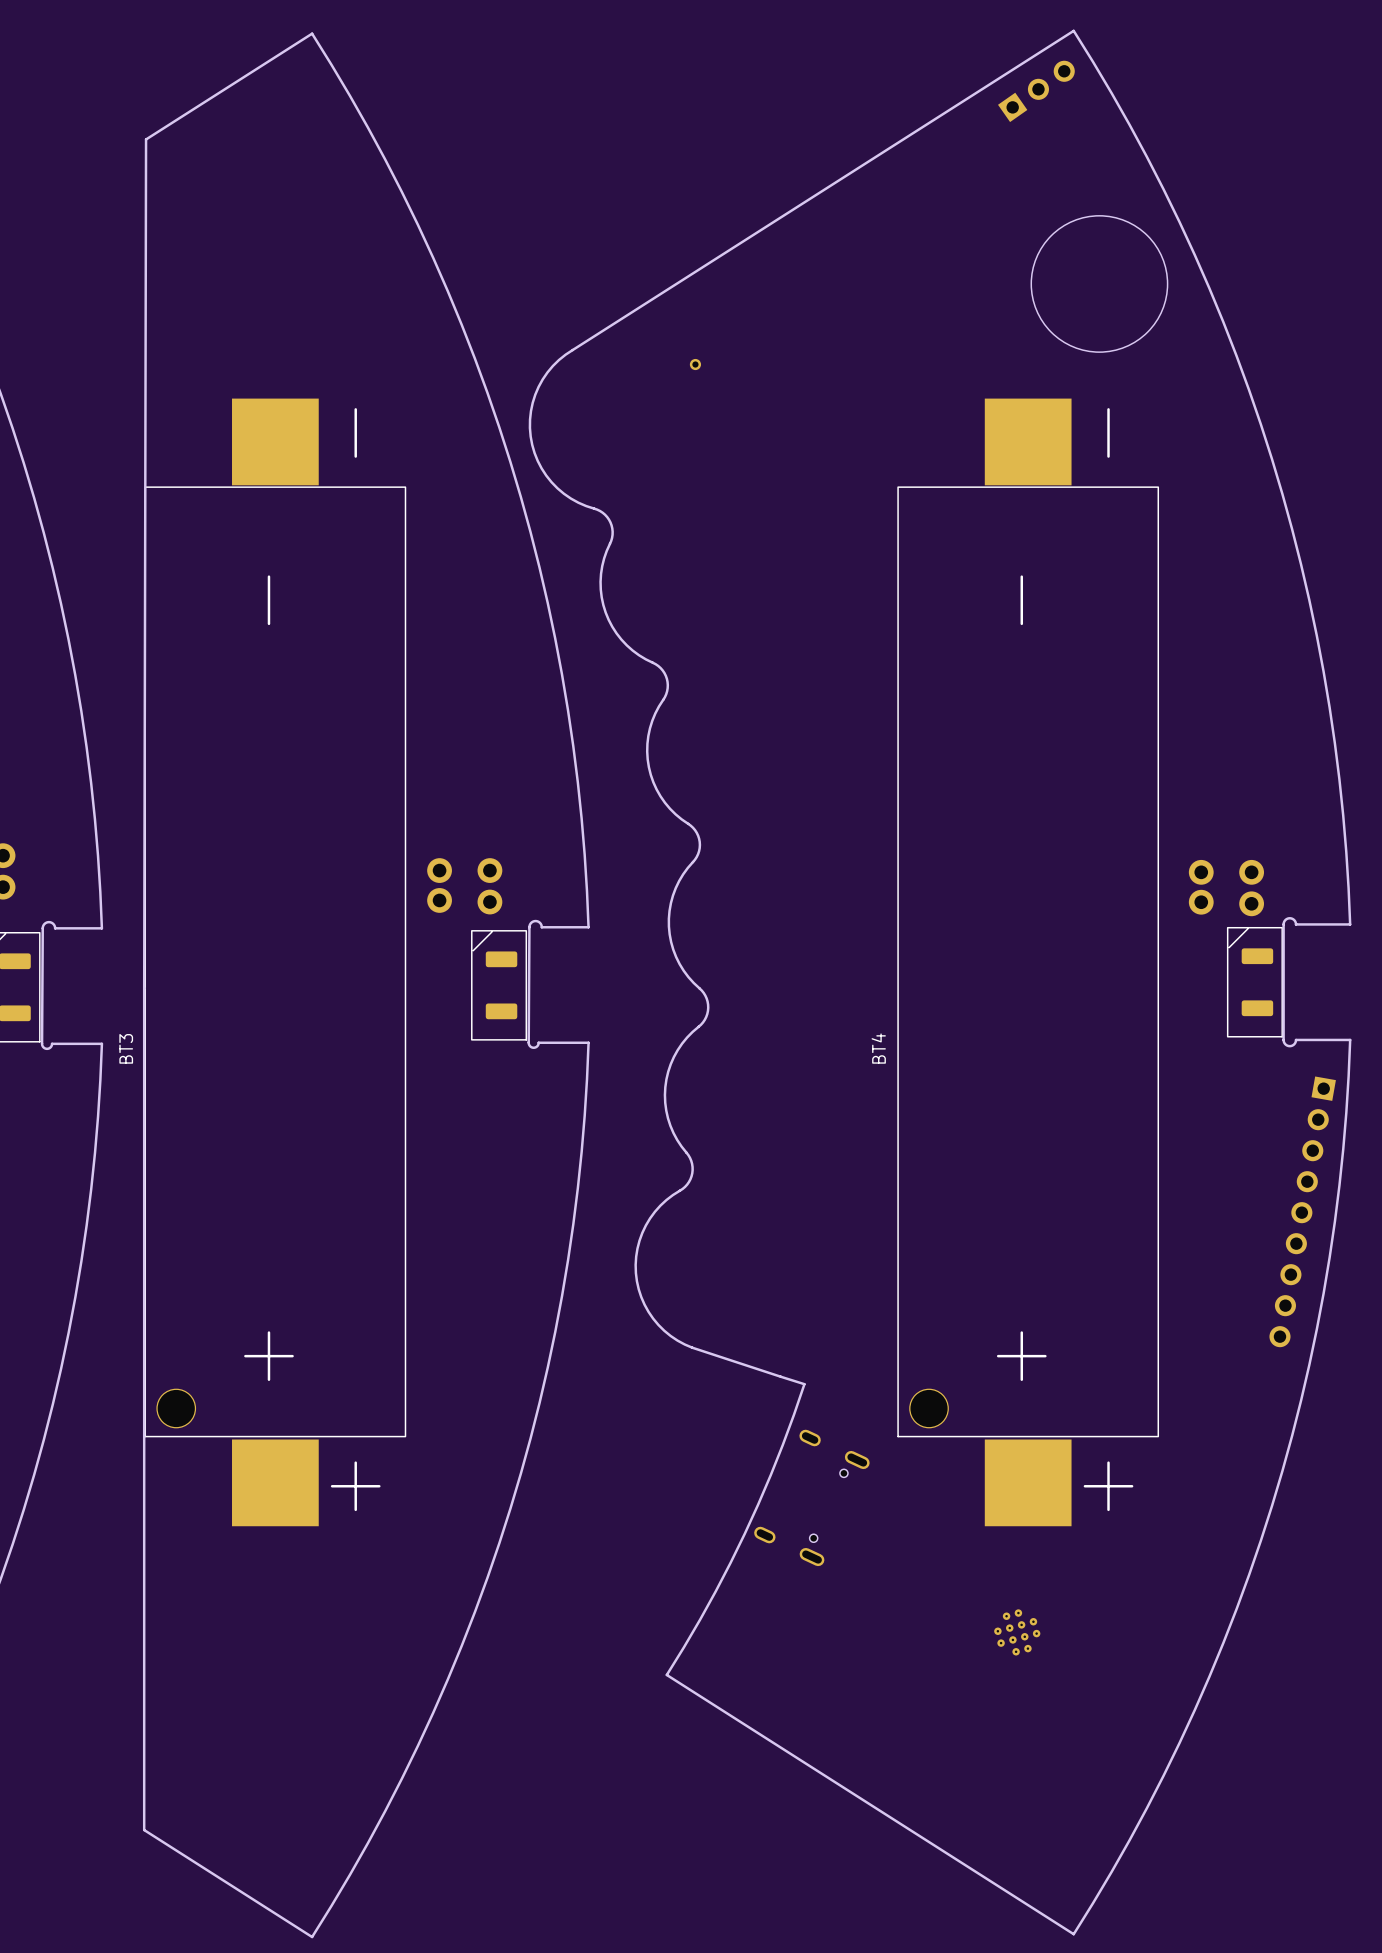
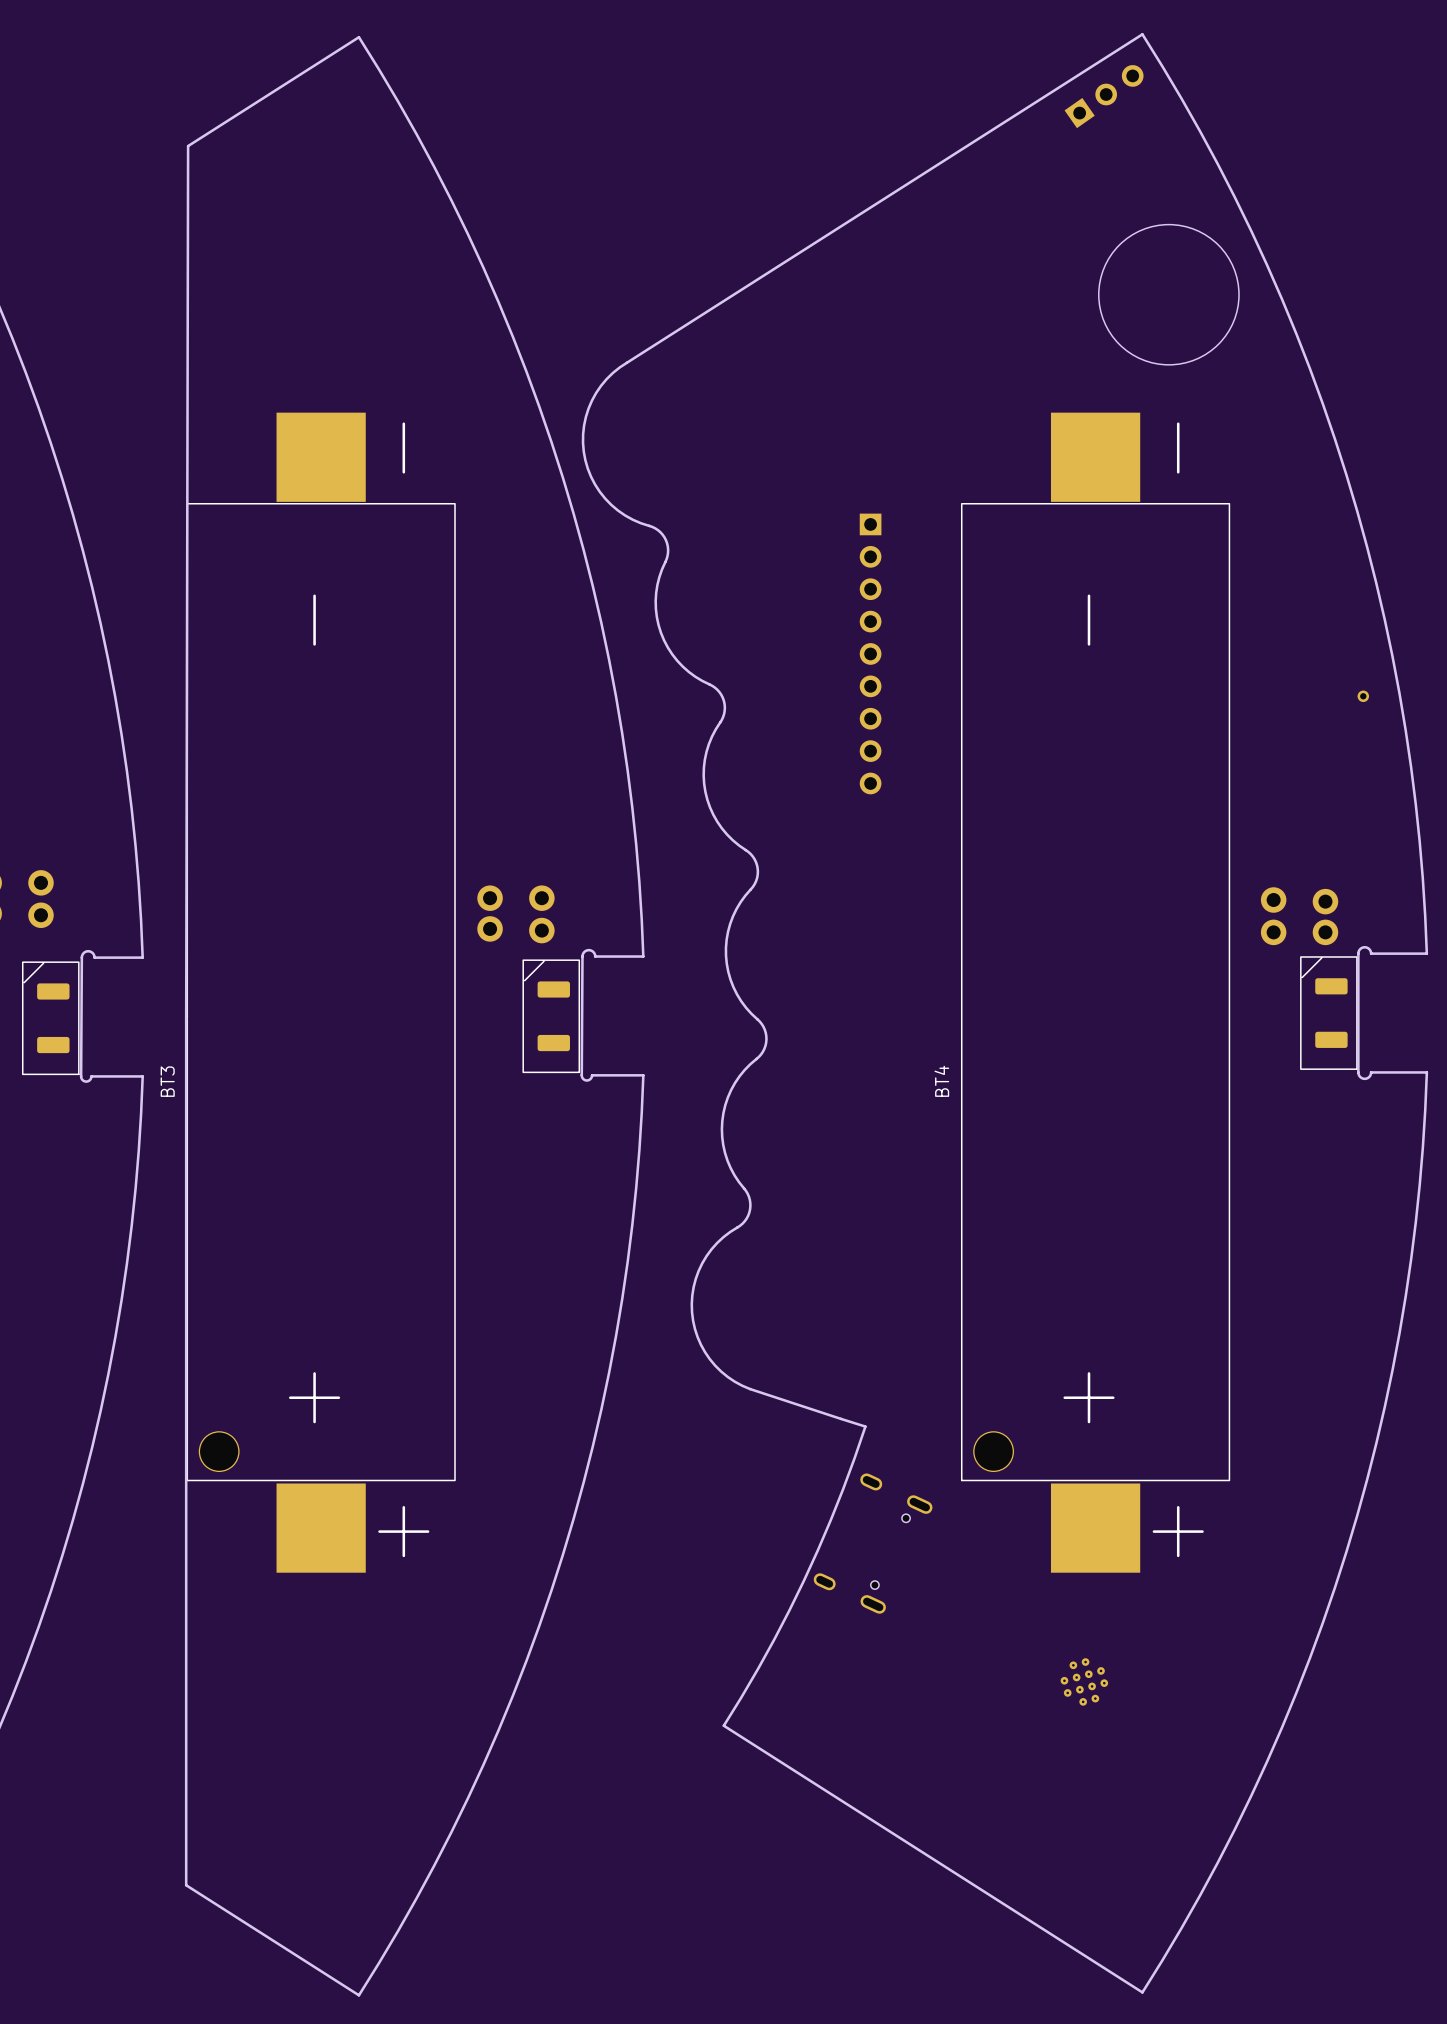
part: (695, 364) -> none
part: none -> (870, 653)
part: none -> (1363, 696)
part rotation: 0° (1226, 888) -> 180° (1299, 916)
part: (1302, 1211) -> none

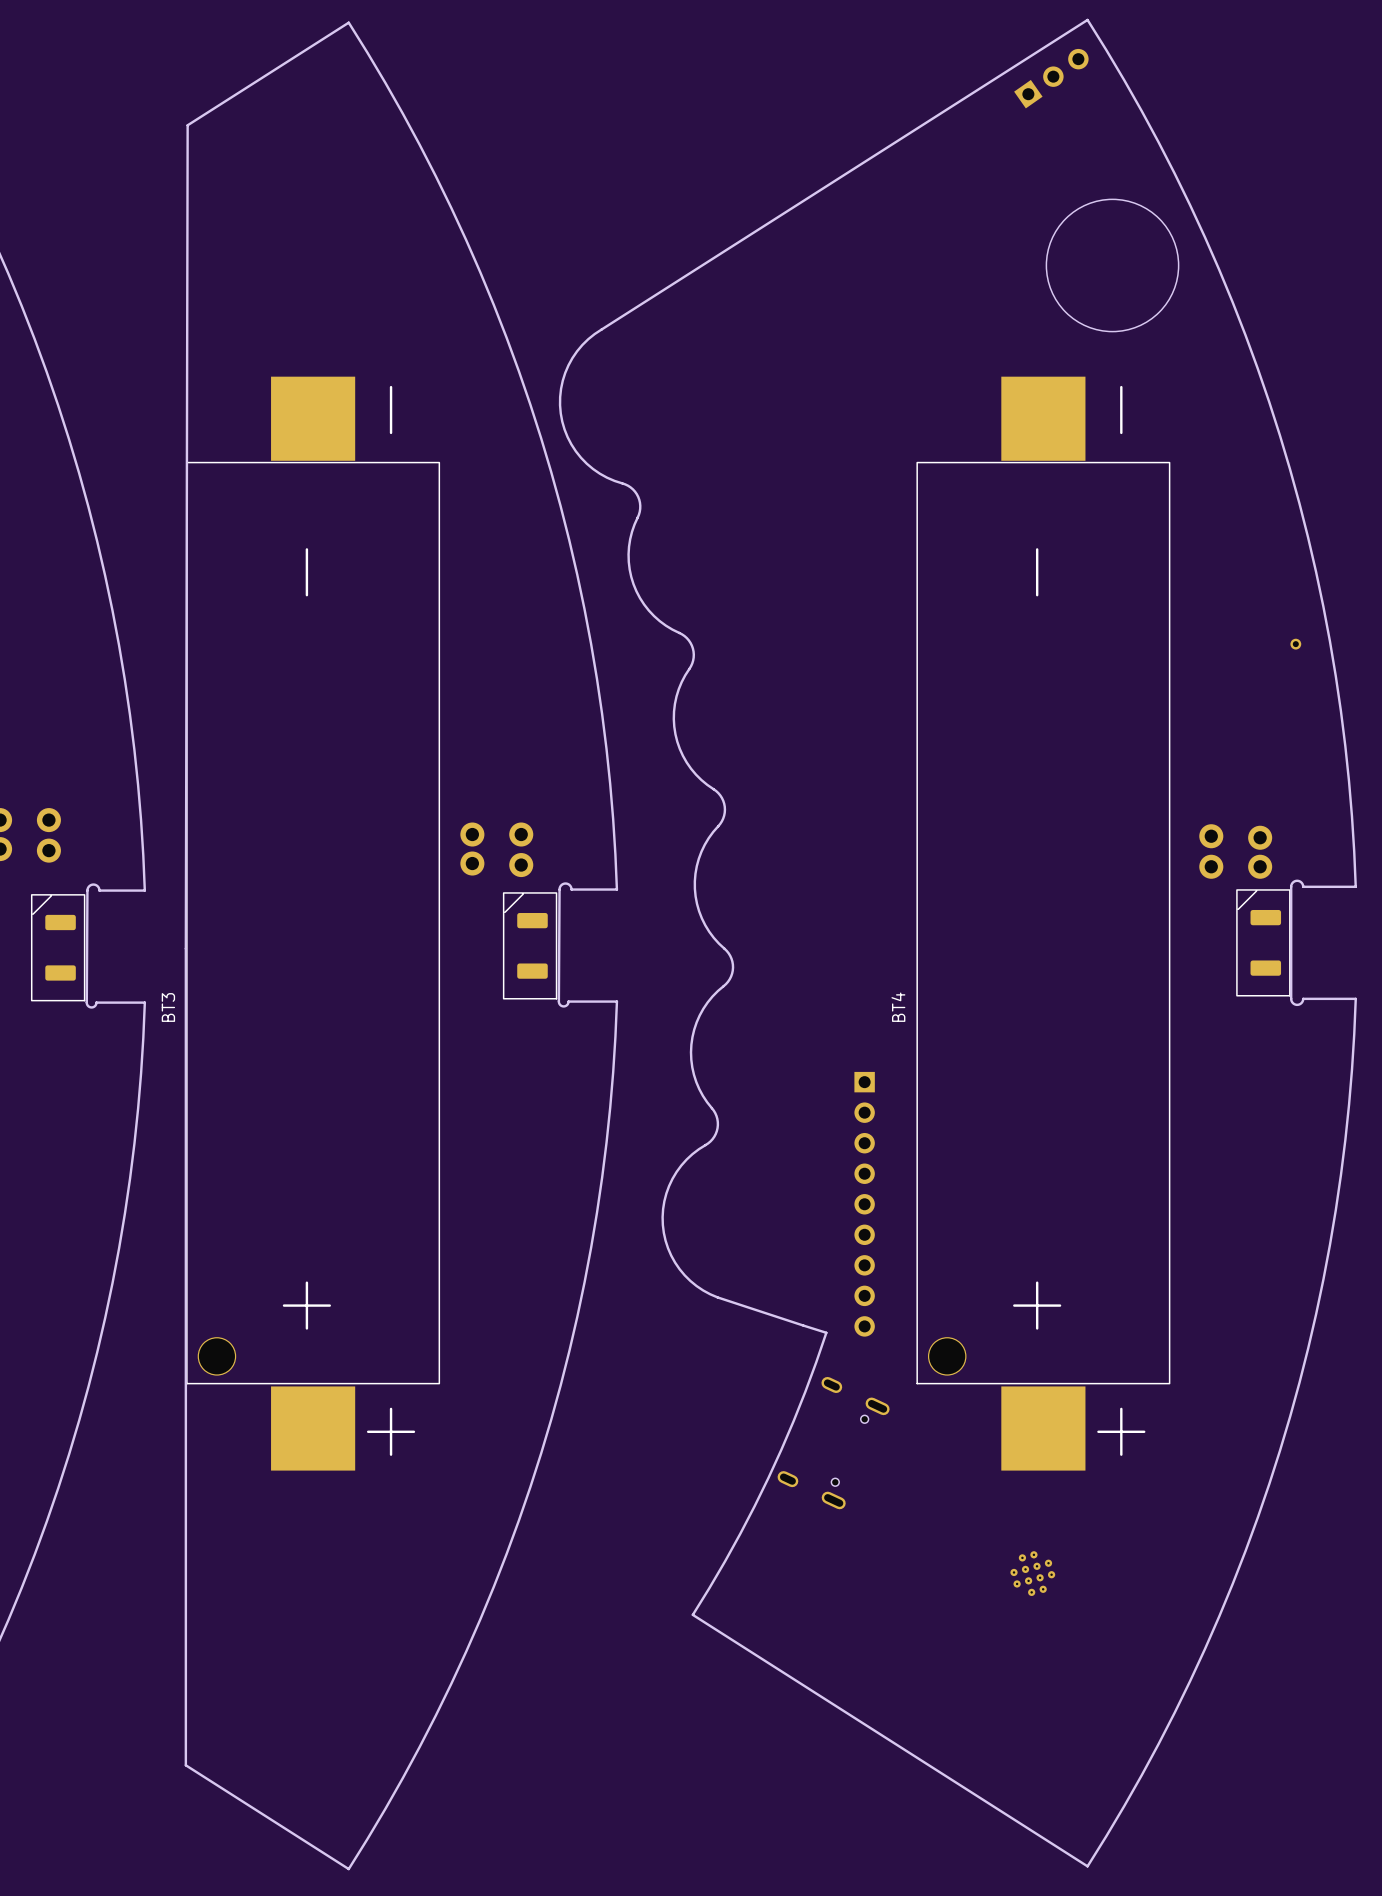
part: (870, 653) -> none
part: none -> (864, 1204)

